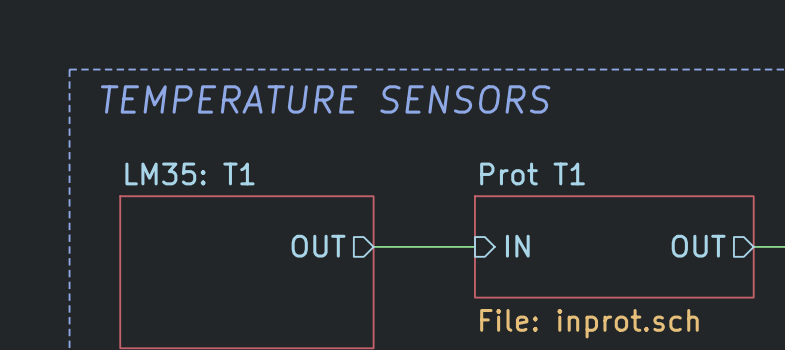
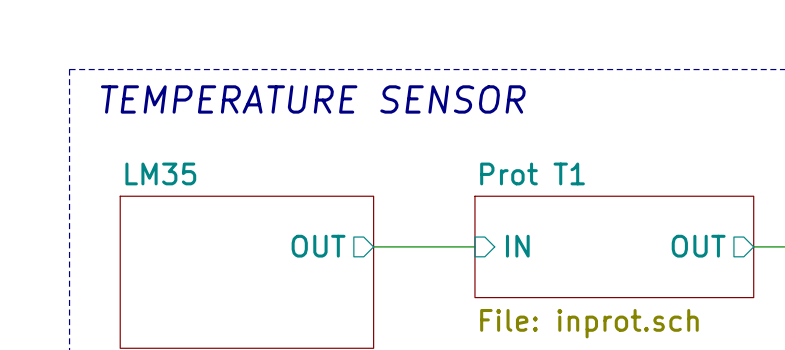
text: TEMPERATURE SENSORS (325, 99) -> TEMPERATURE SENSOR (313, 99)
sheet LM35 name: LM35: T1 (189, 173) -> LM35 (160, 173)

